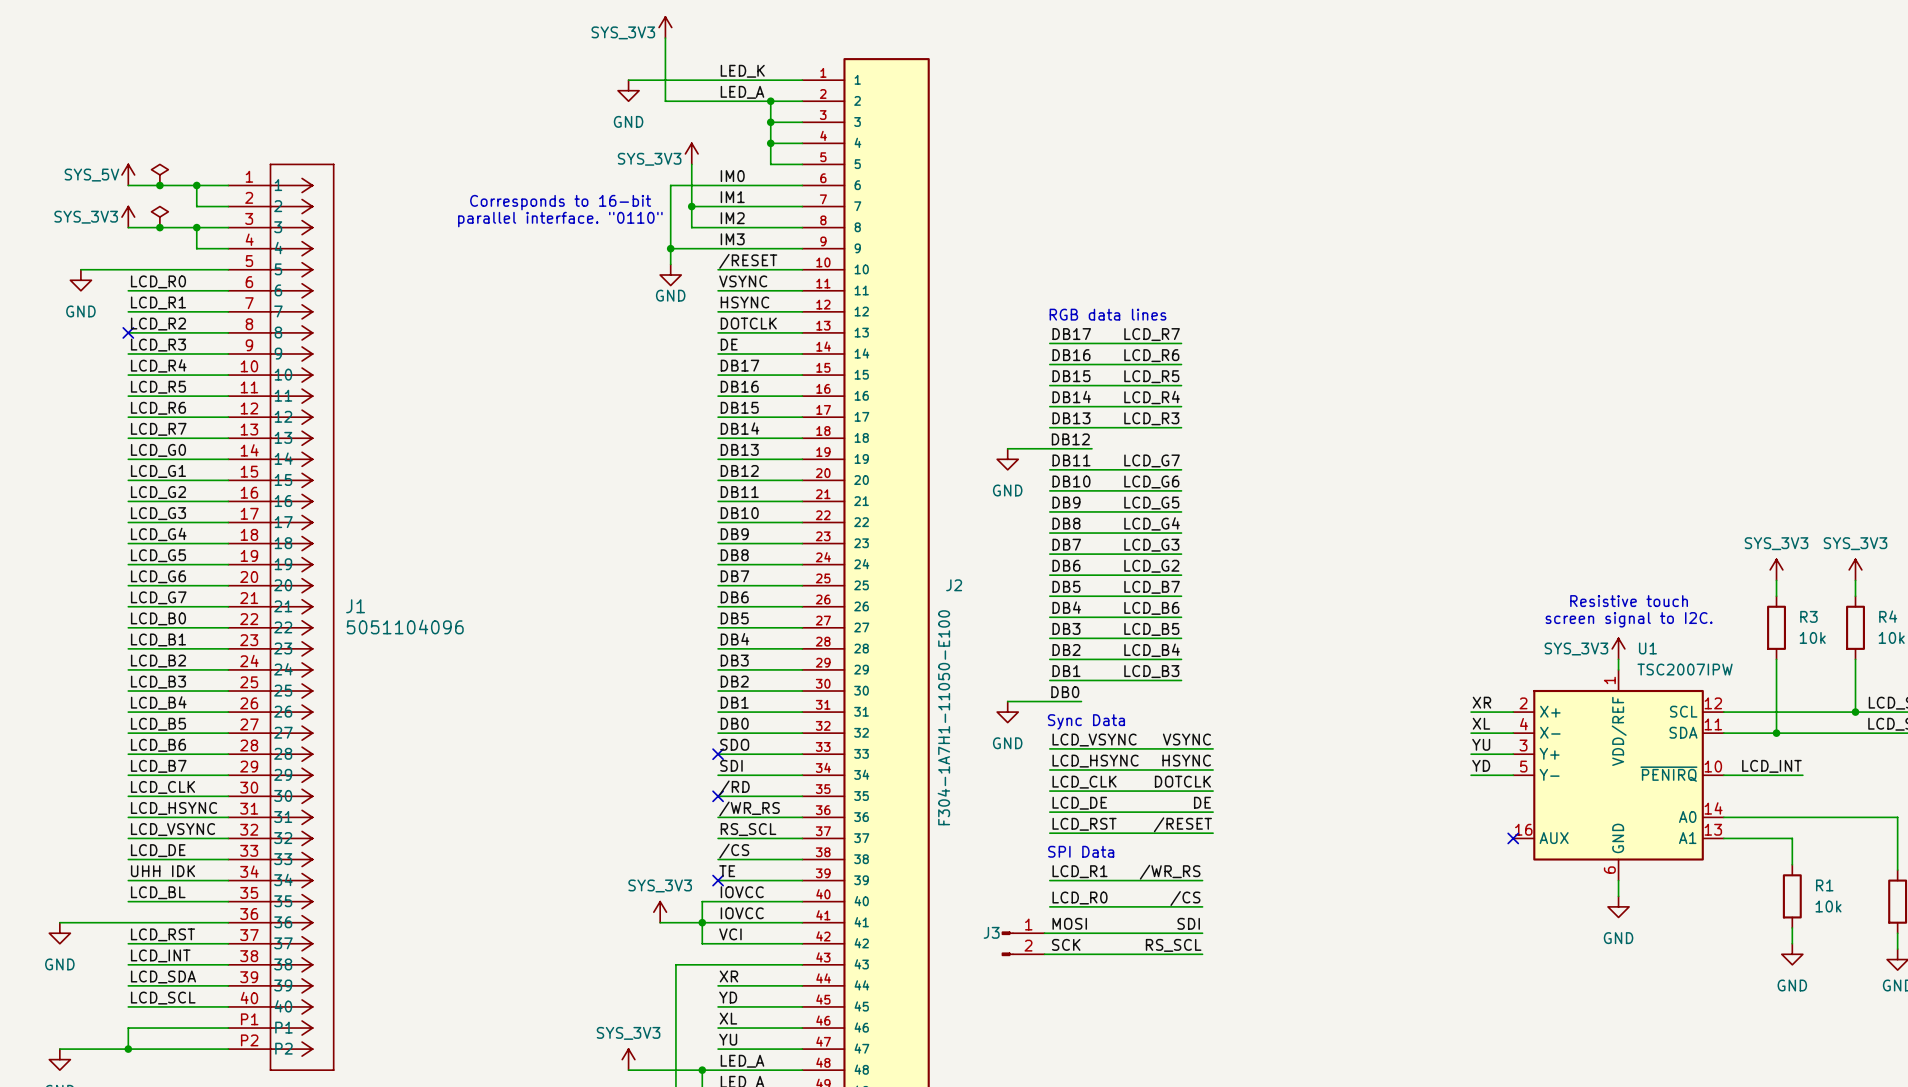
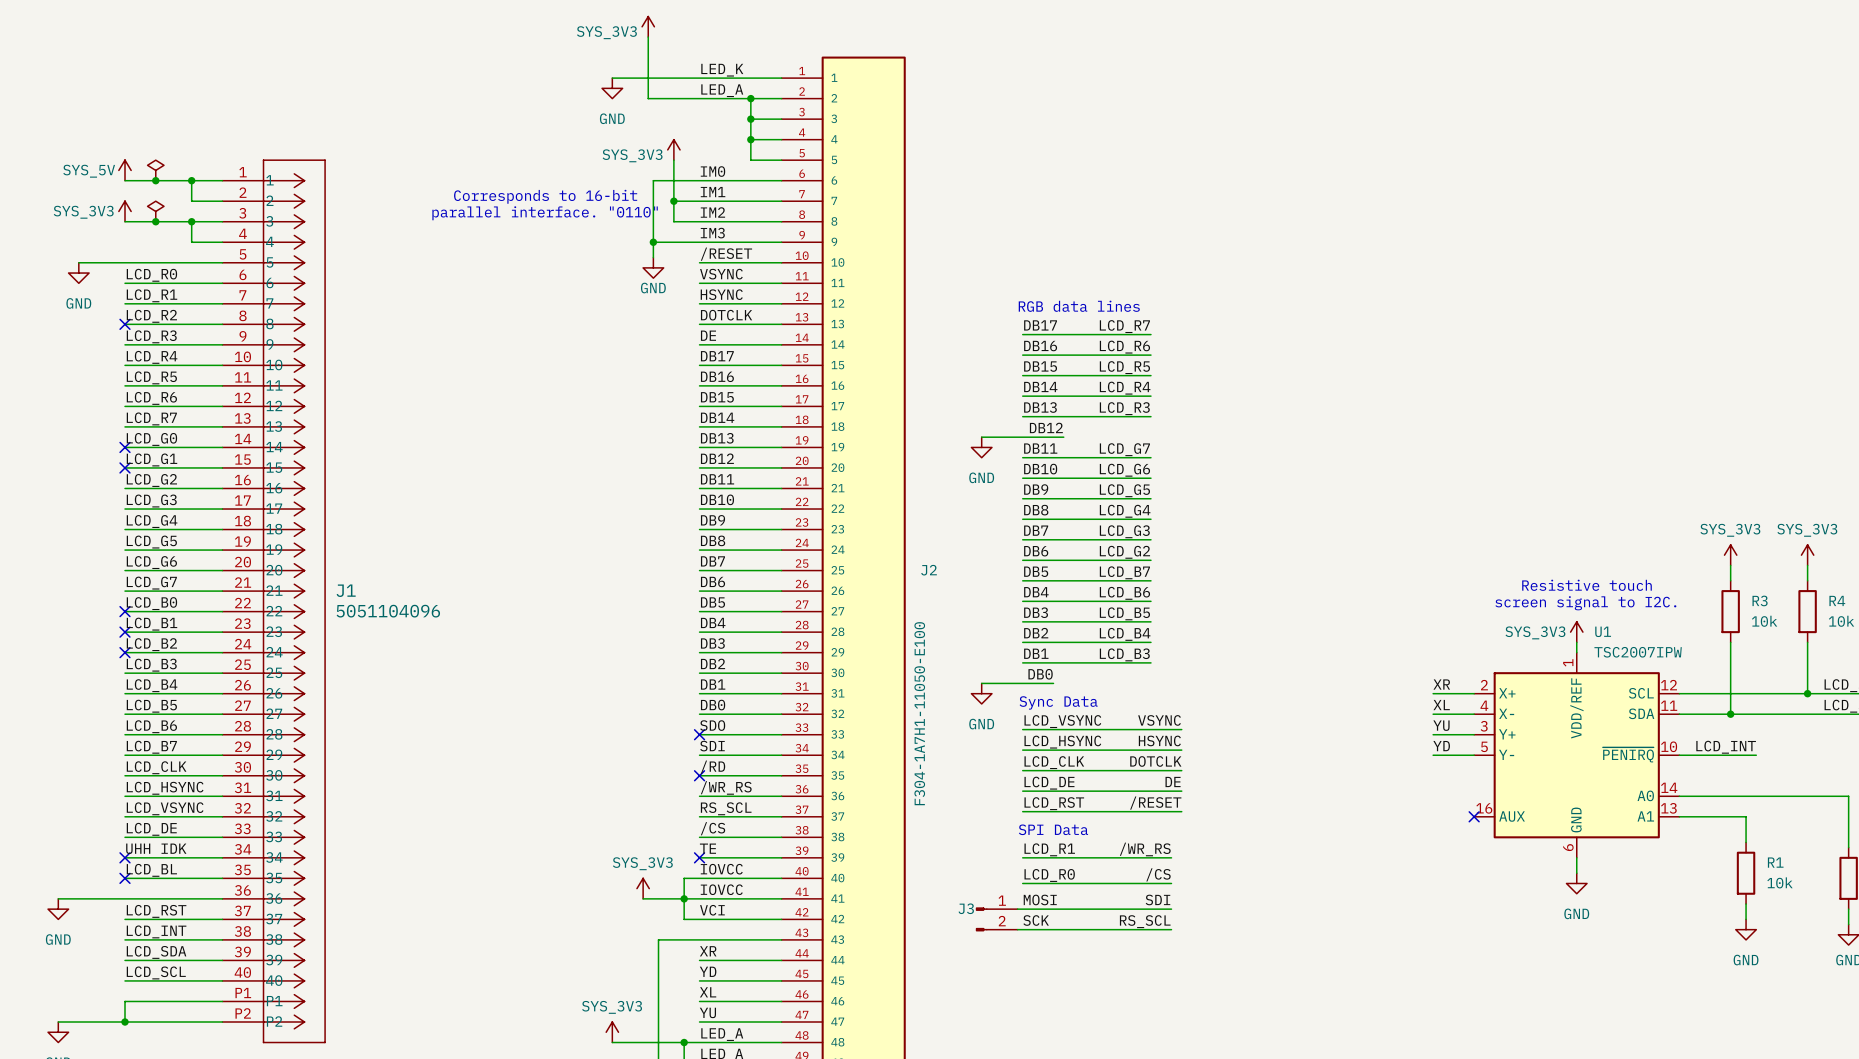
no-connect mark: none -> (125, 447)
no-connect mark: none -> (125, 467)
no-connect mark: none -> (125, 611)
no-connect mark: none -> (125, 632)
no-connect mark: none -> (125, 652)
no-connect mark: none -> (125, 857)
no-connect mark: none -> (125, 878)

